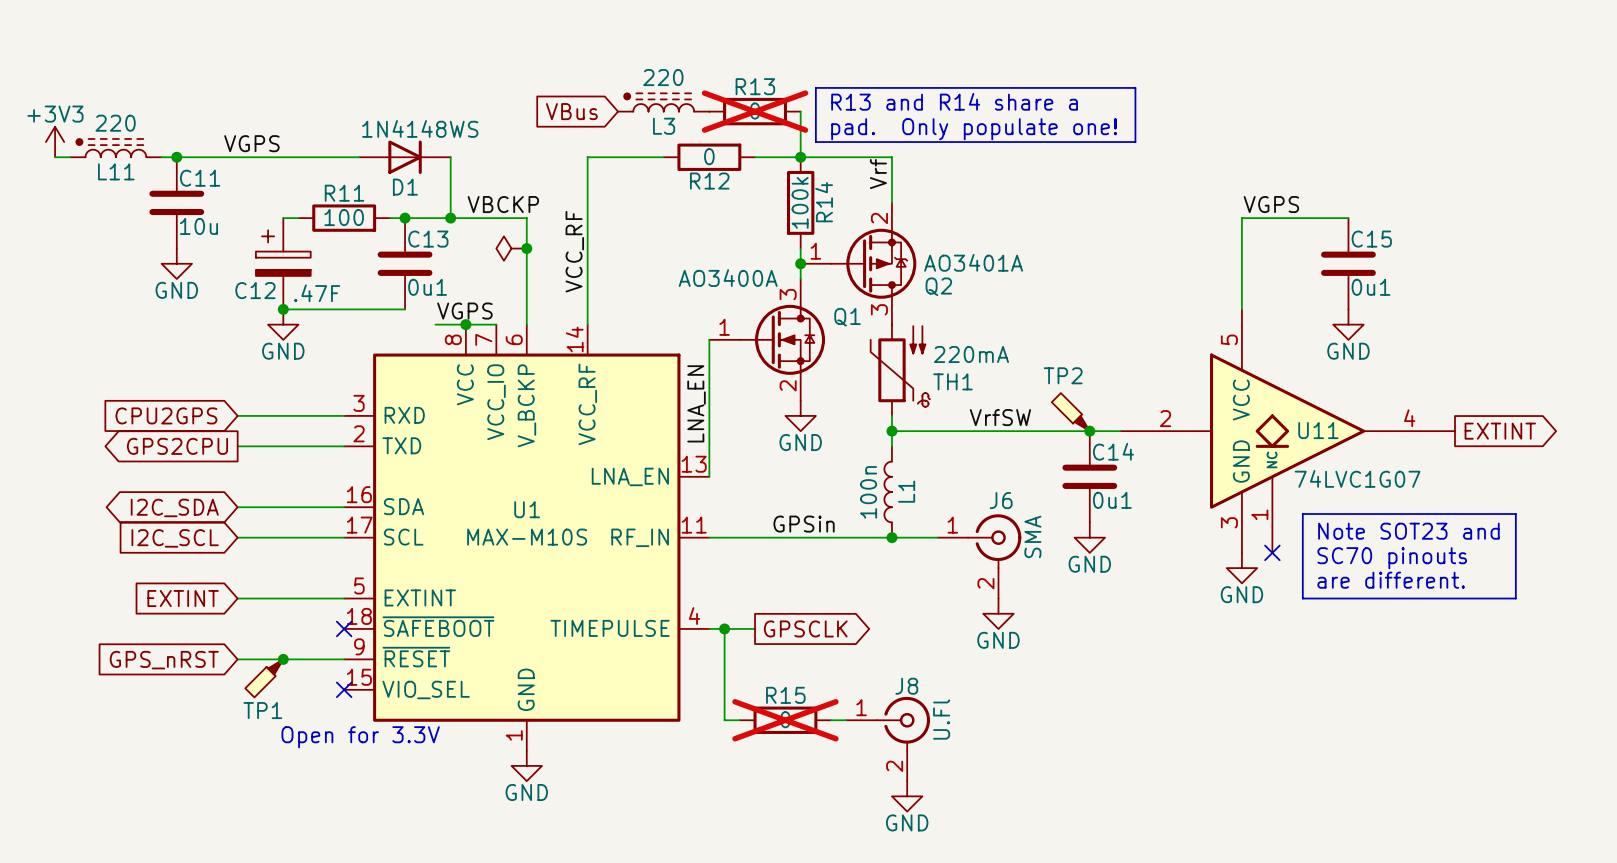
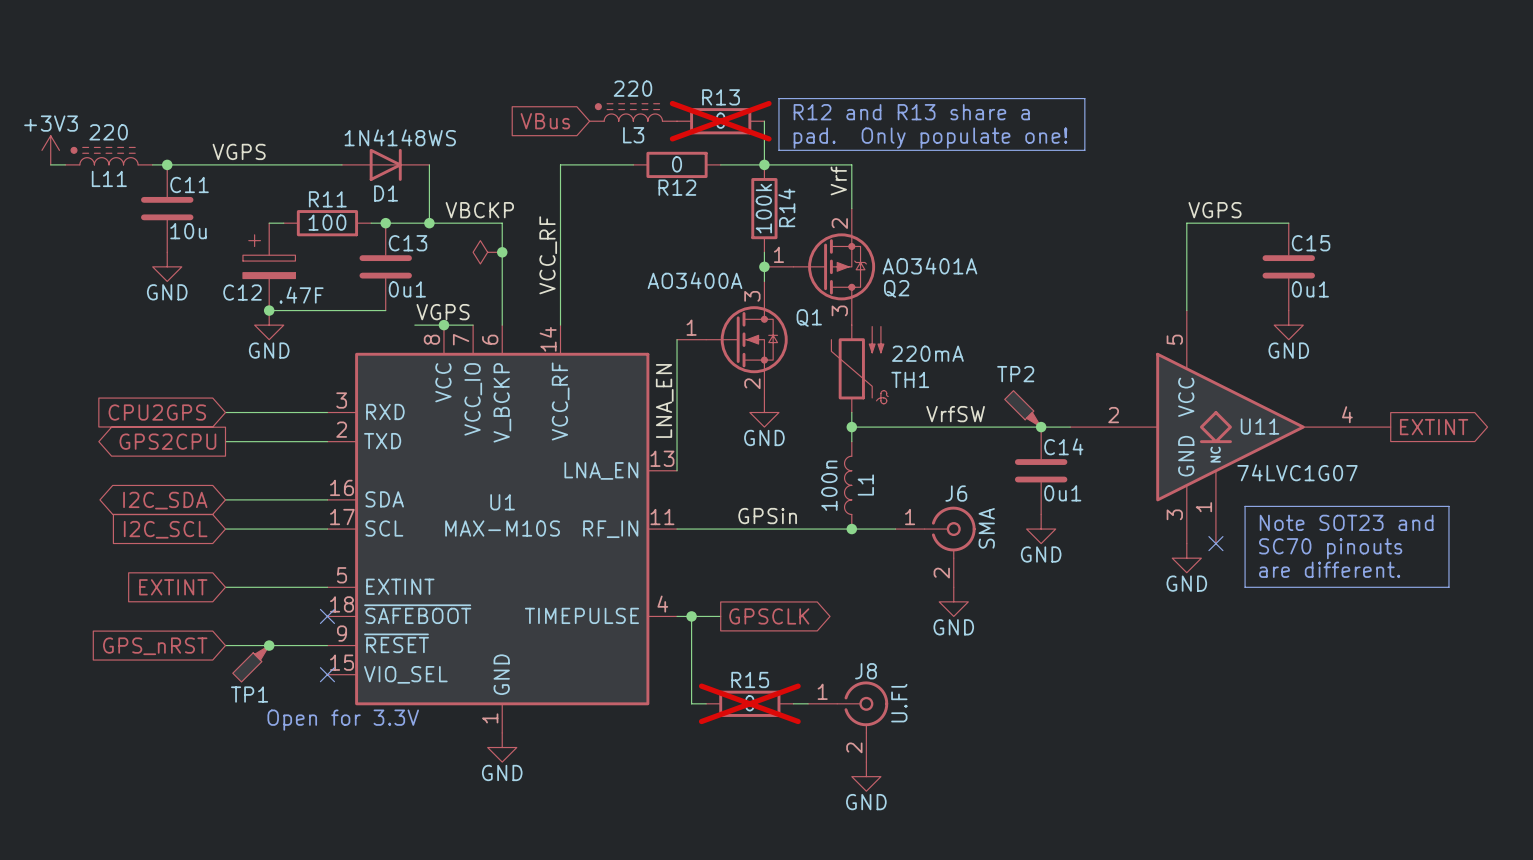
text: R13 and R14 share a (954, 101) -> R12 and R13 share a (911, 112)

